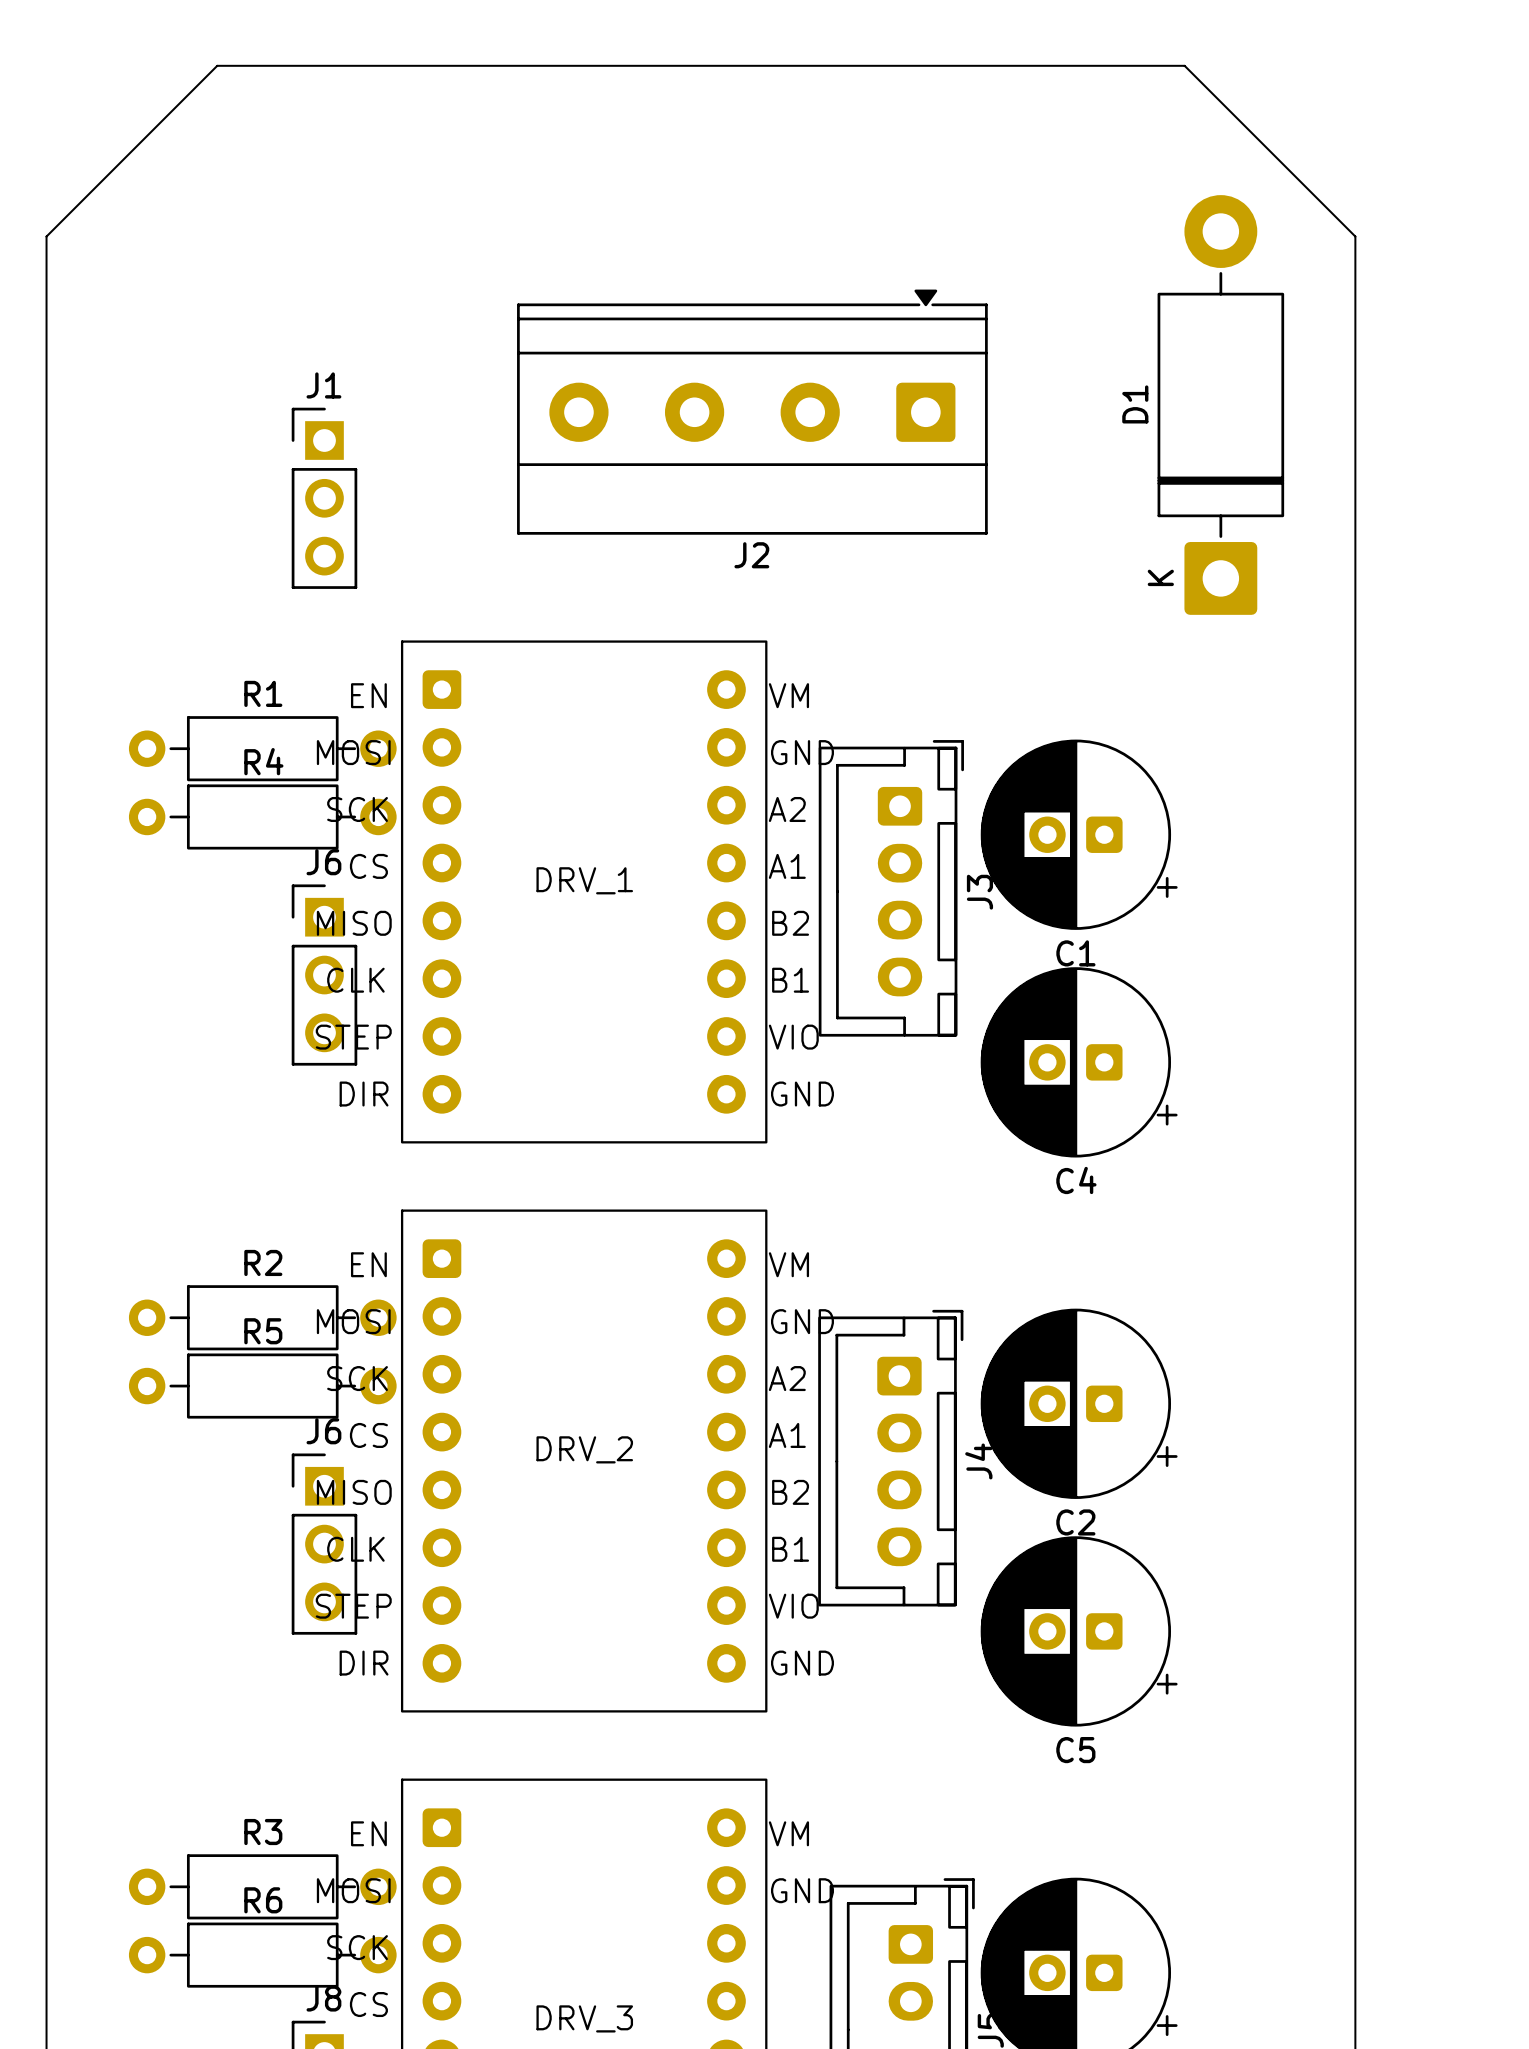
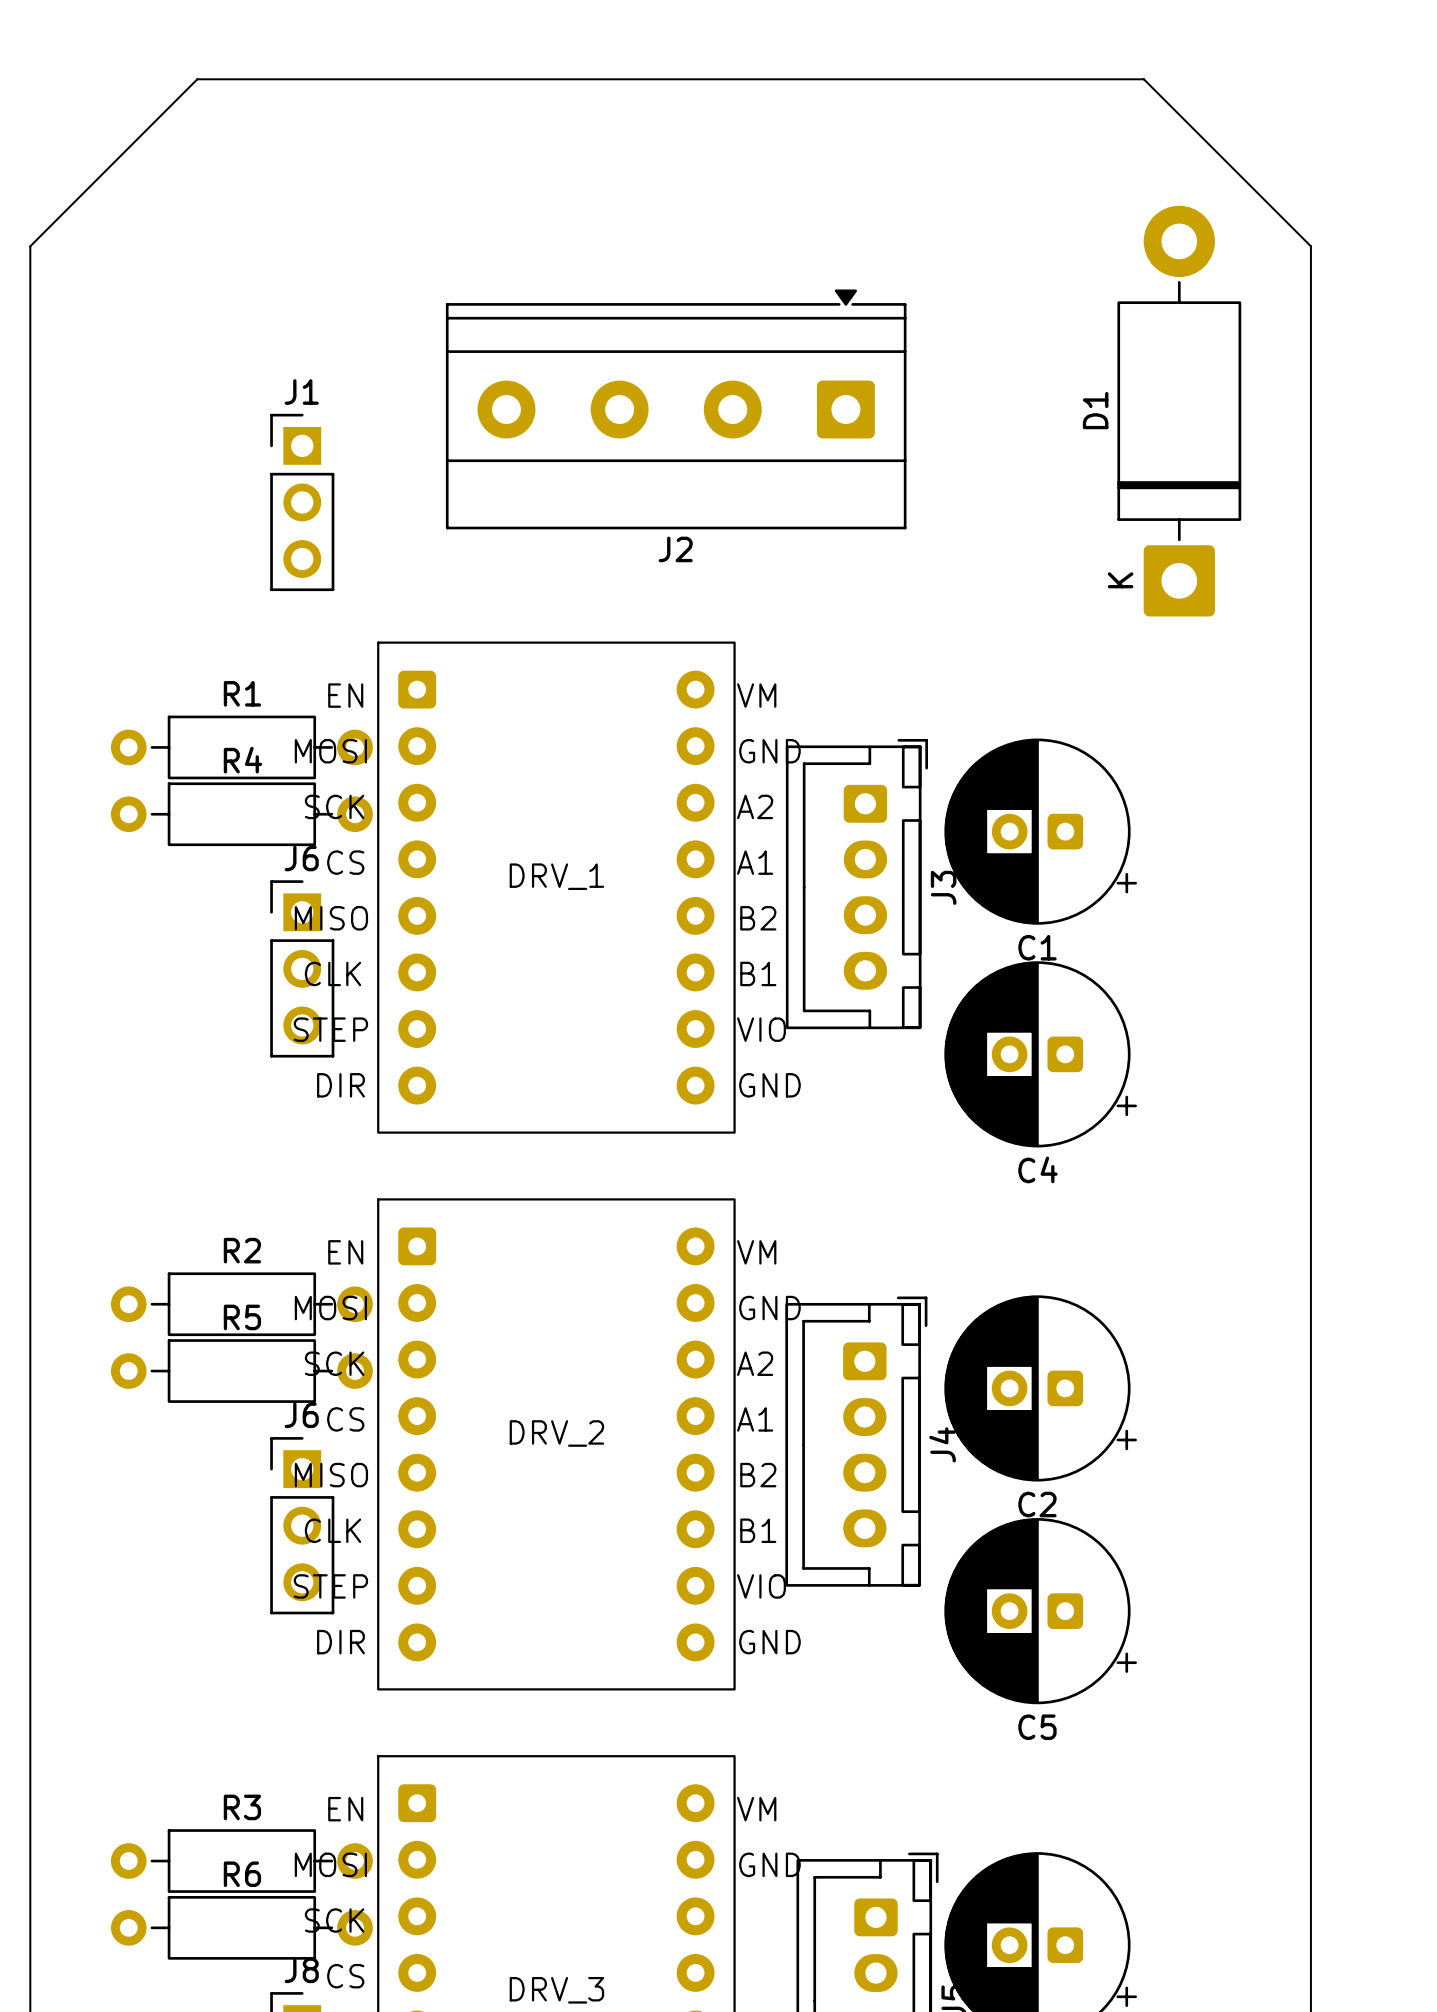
J2 position: (752, 412) -> (676, 409)

